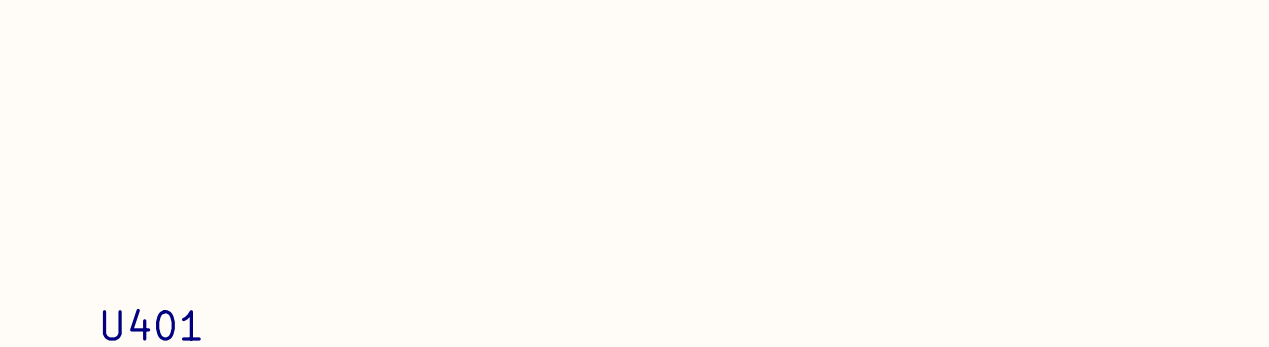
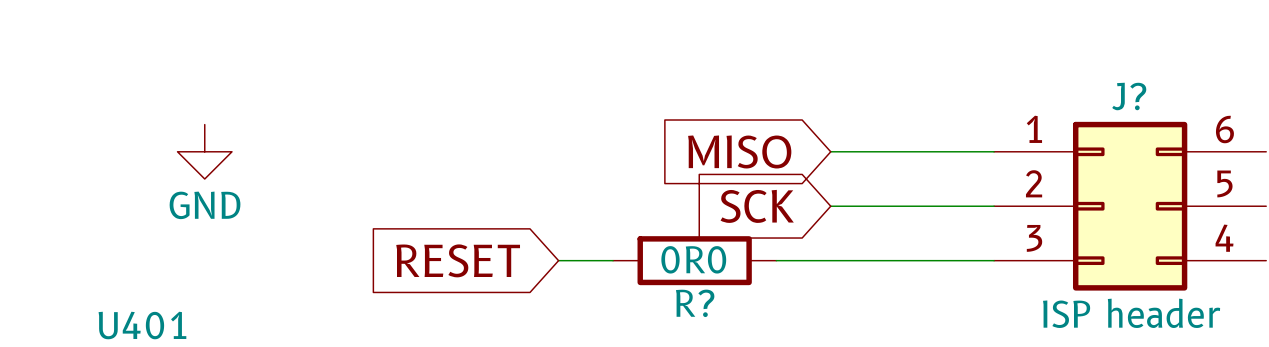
power symbol: none -> GND (204, 151)
global label: none -> MISO (739, 151)
wire: none -> (830, 151) (994, 151)
global label: none -> SCK (757, 206)
wire: none -> (830, 206) (994, 206)
J?: none -> ISP header (1130, 206)
global label: none -> RESET (458, 260)
wire: none -> (558, 260) (613, 260)
R?: none -> 0R0 (694, 260)
wire: none -> (776, 260) (994, 260)

